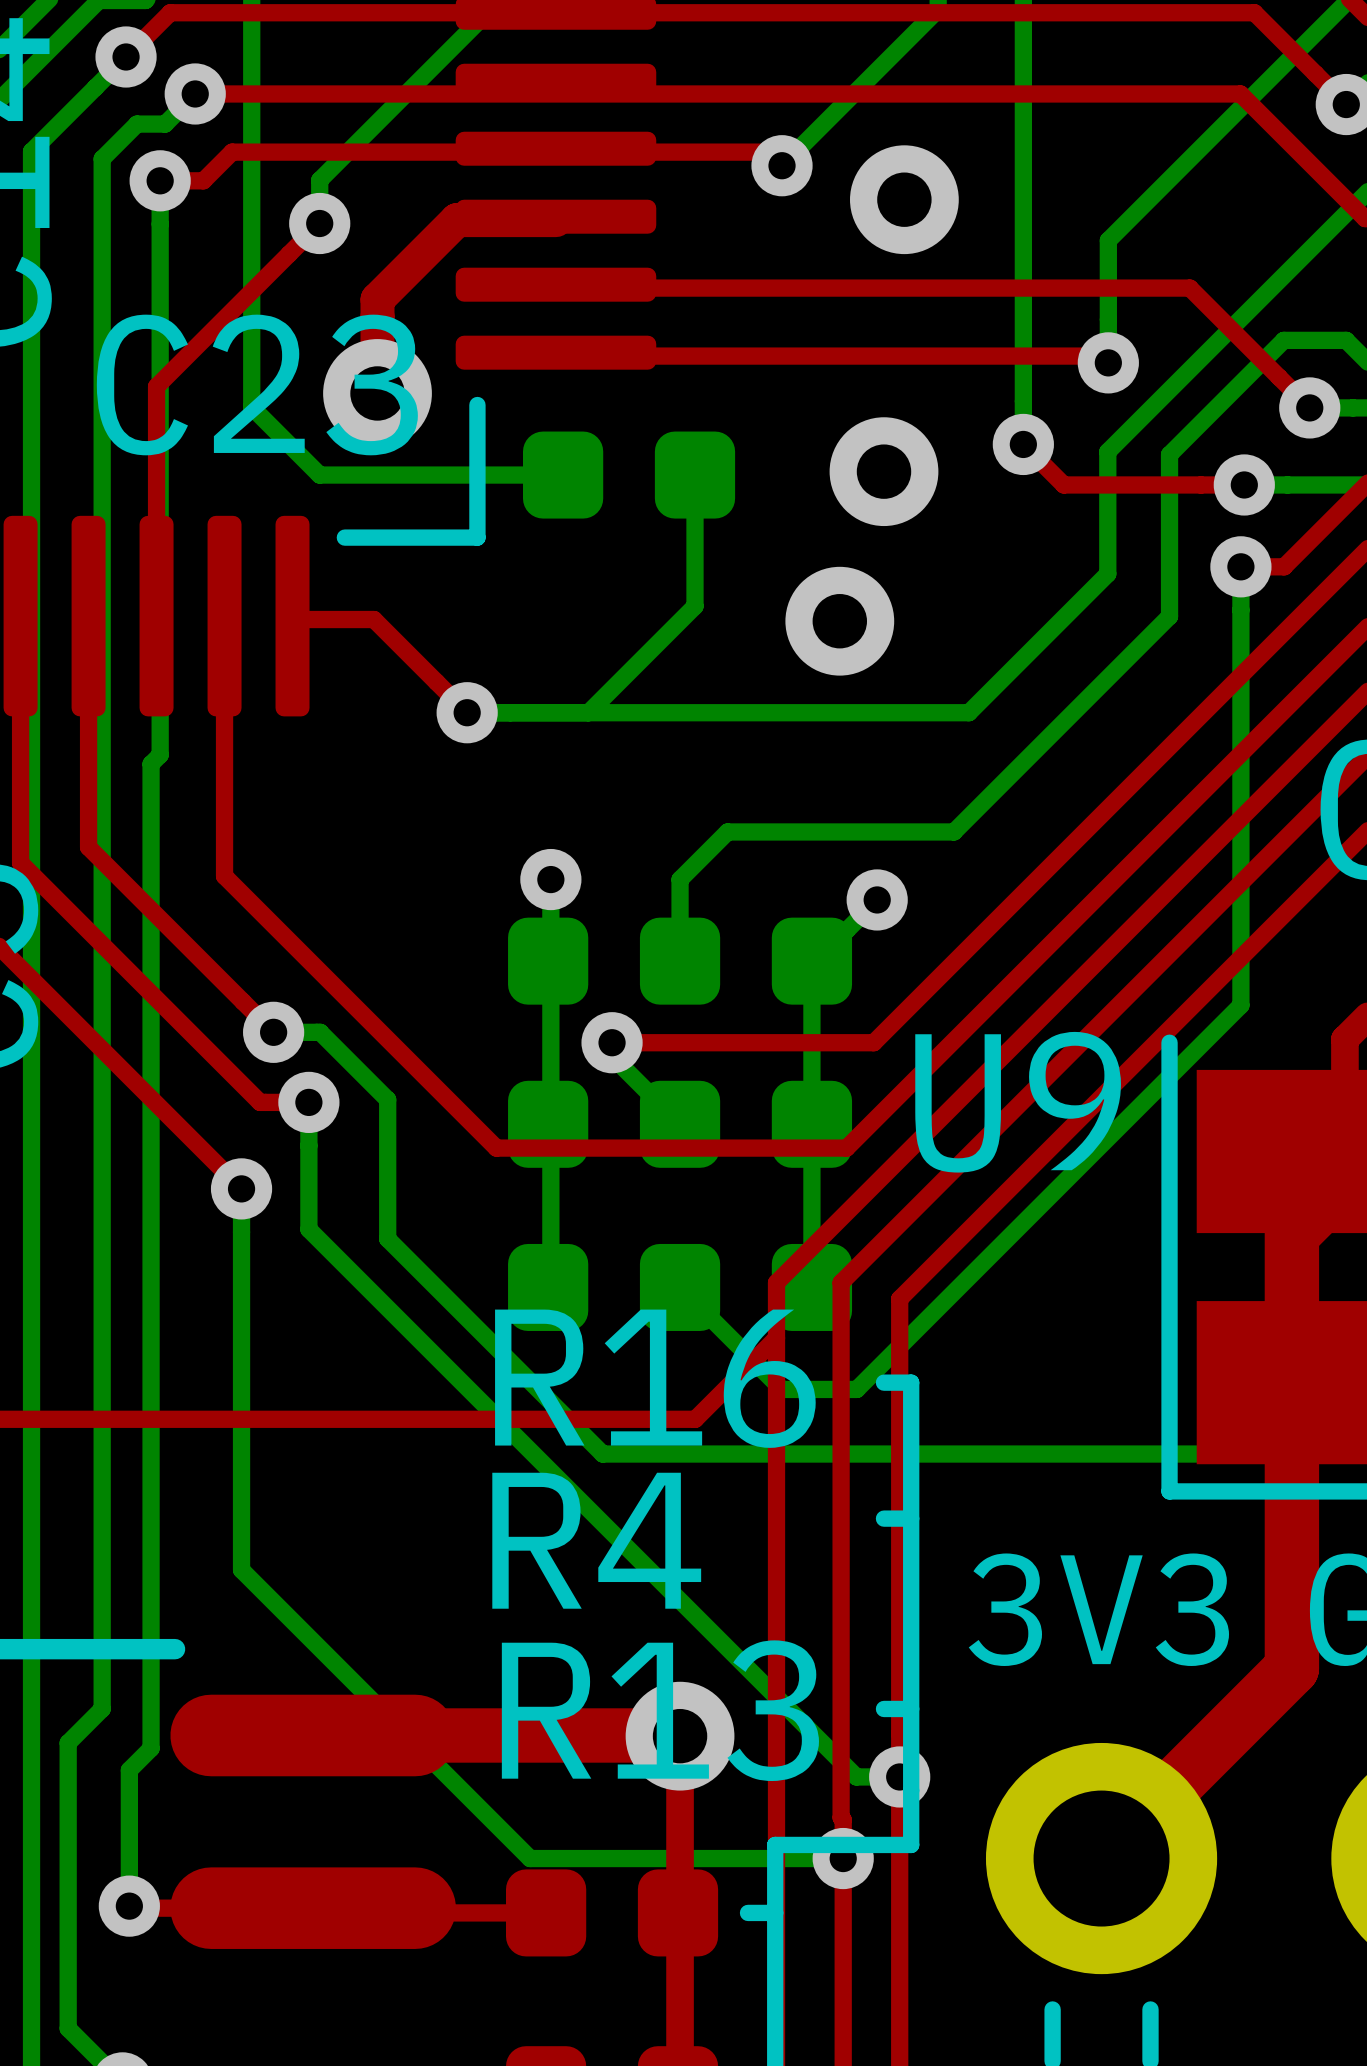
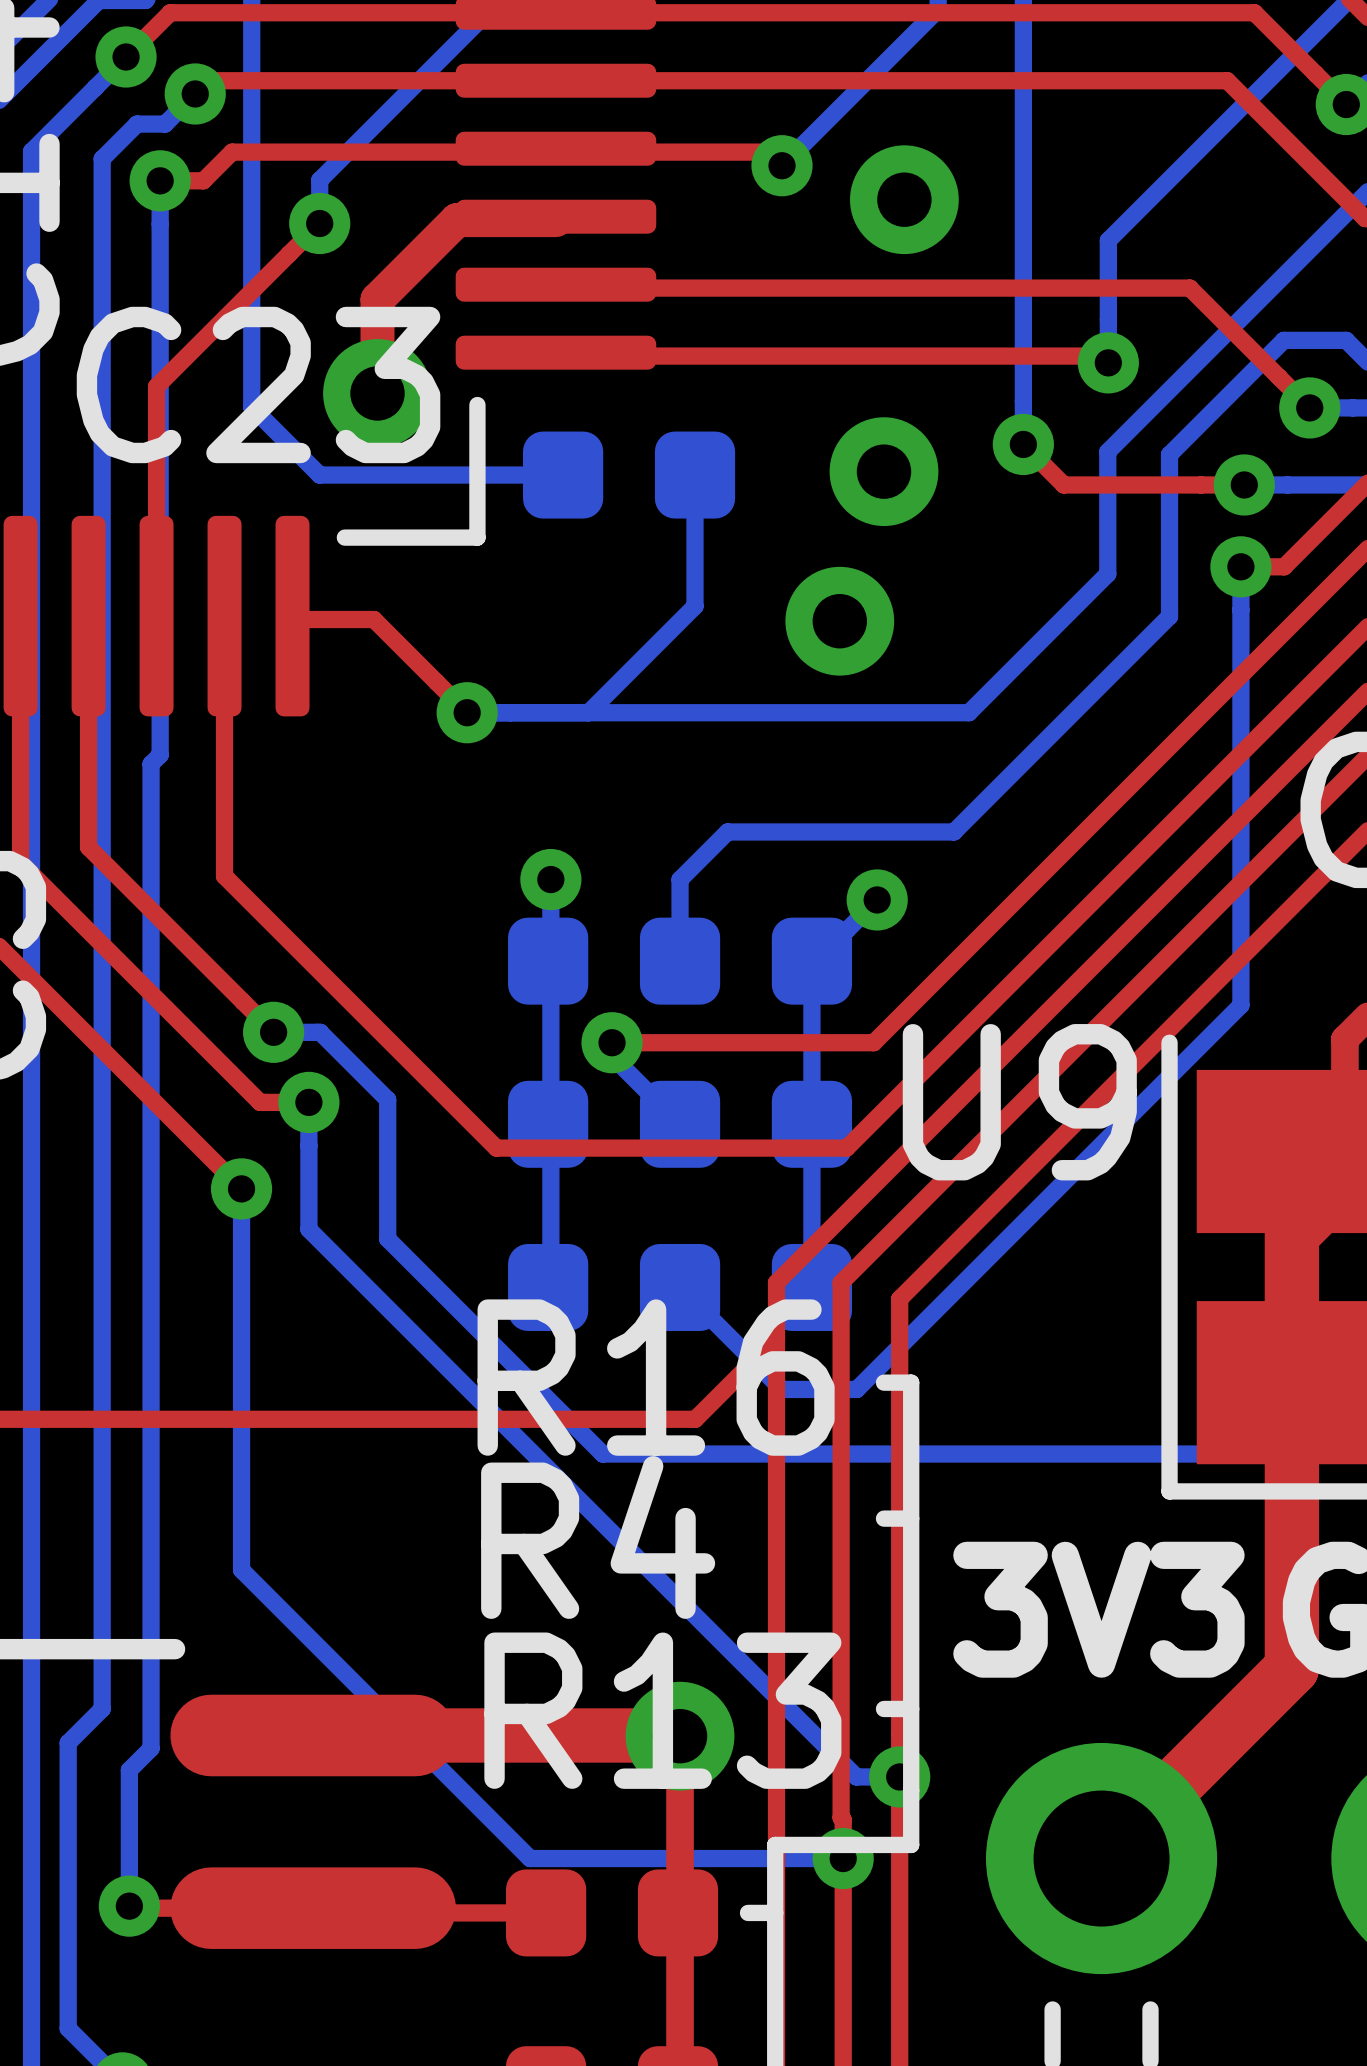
top track: (195, 93) (1240, 93) -> (195, 93) (208, 80) (1227, 80) (1240, 93)

